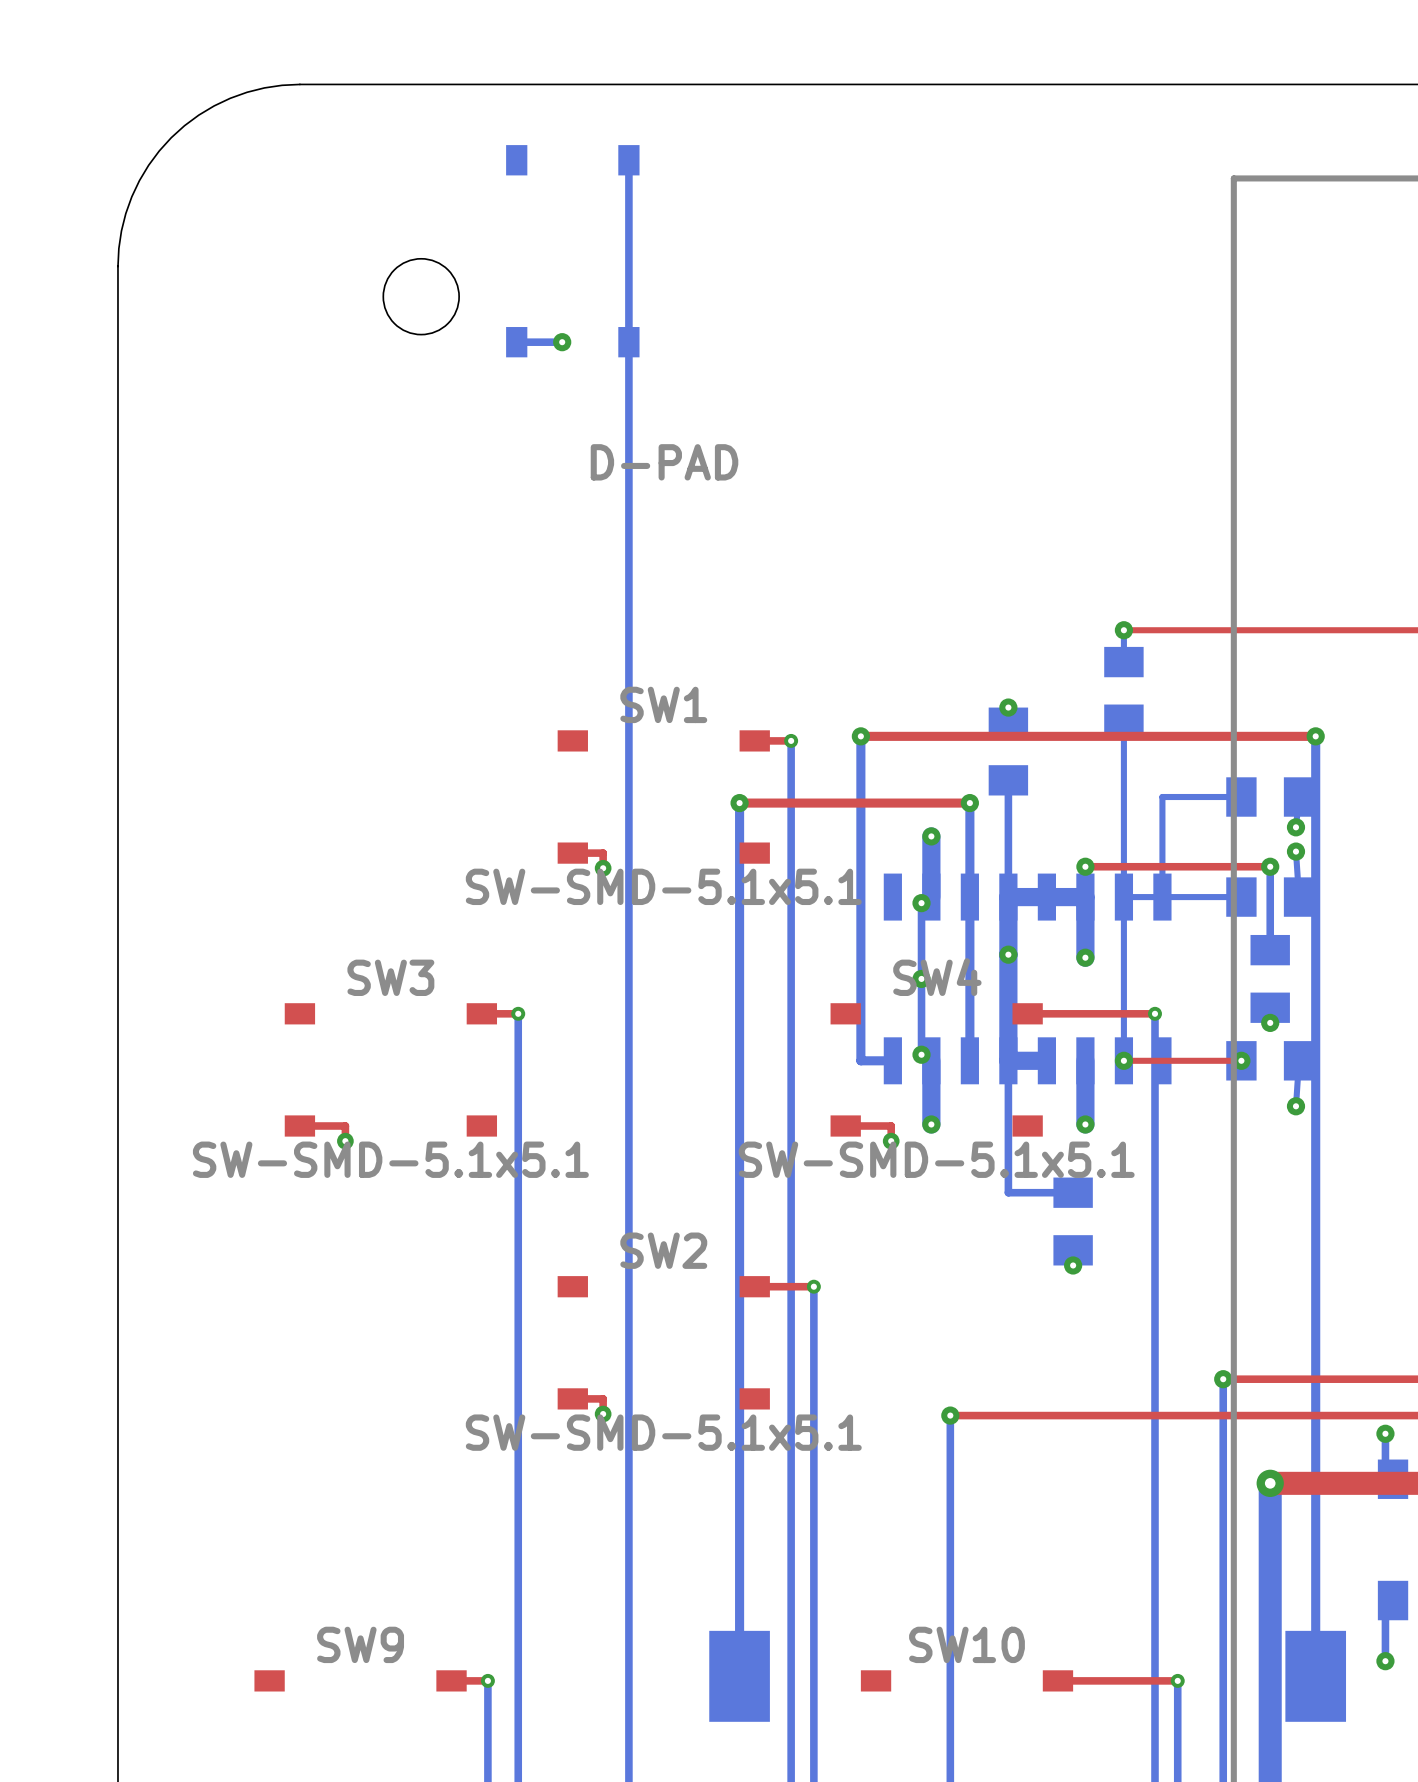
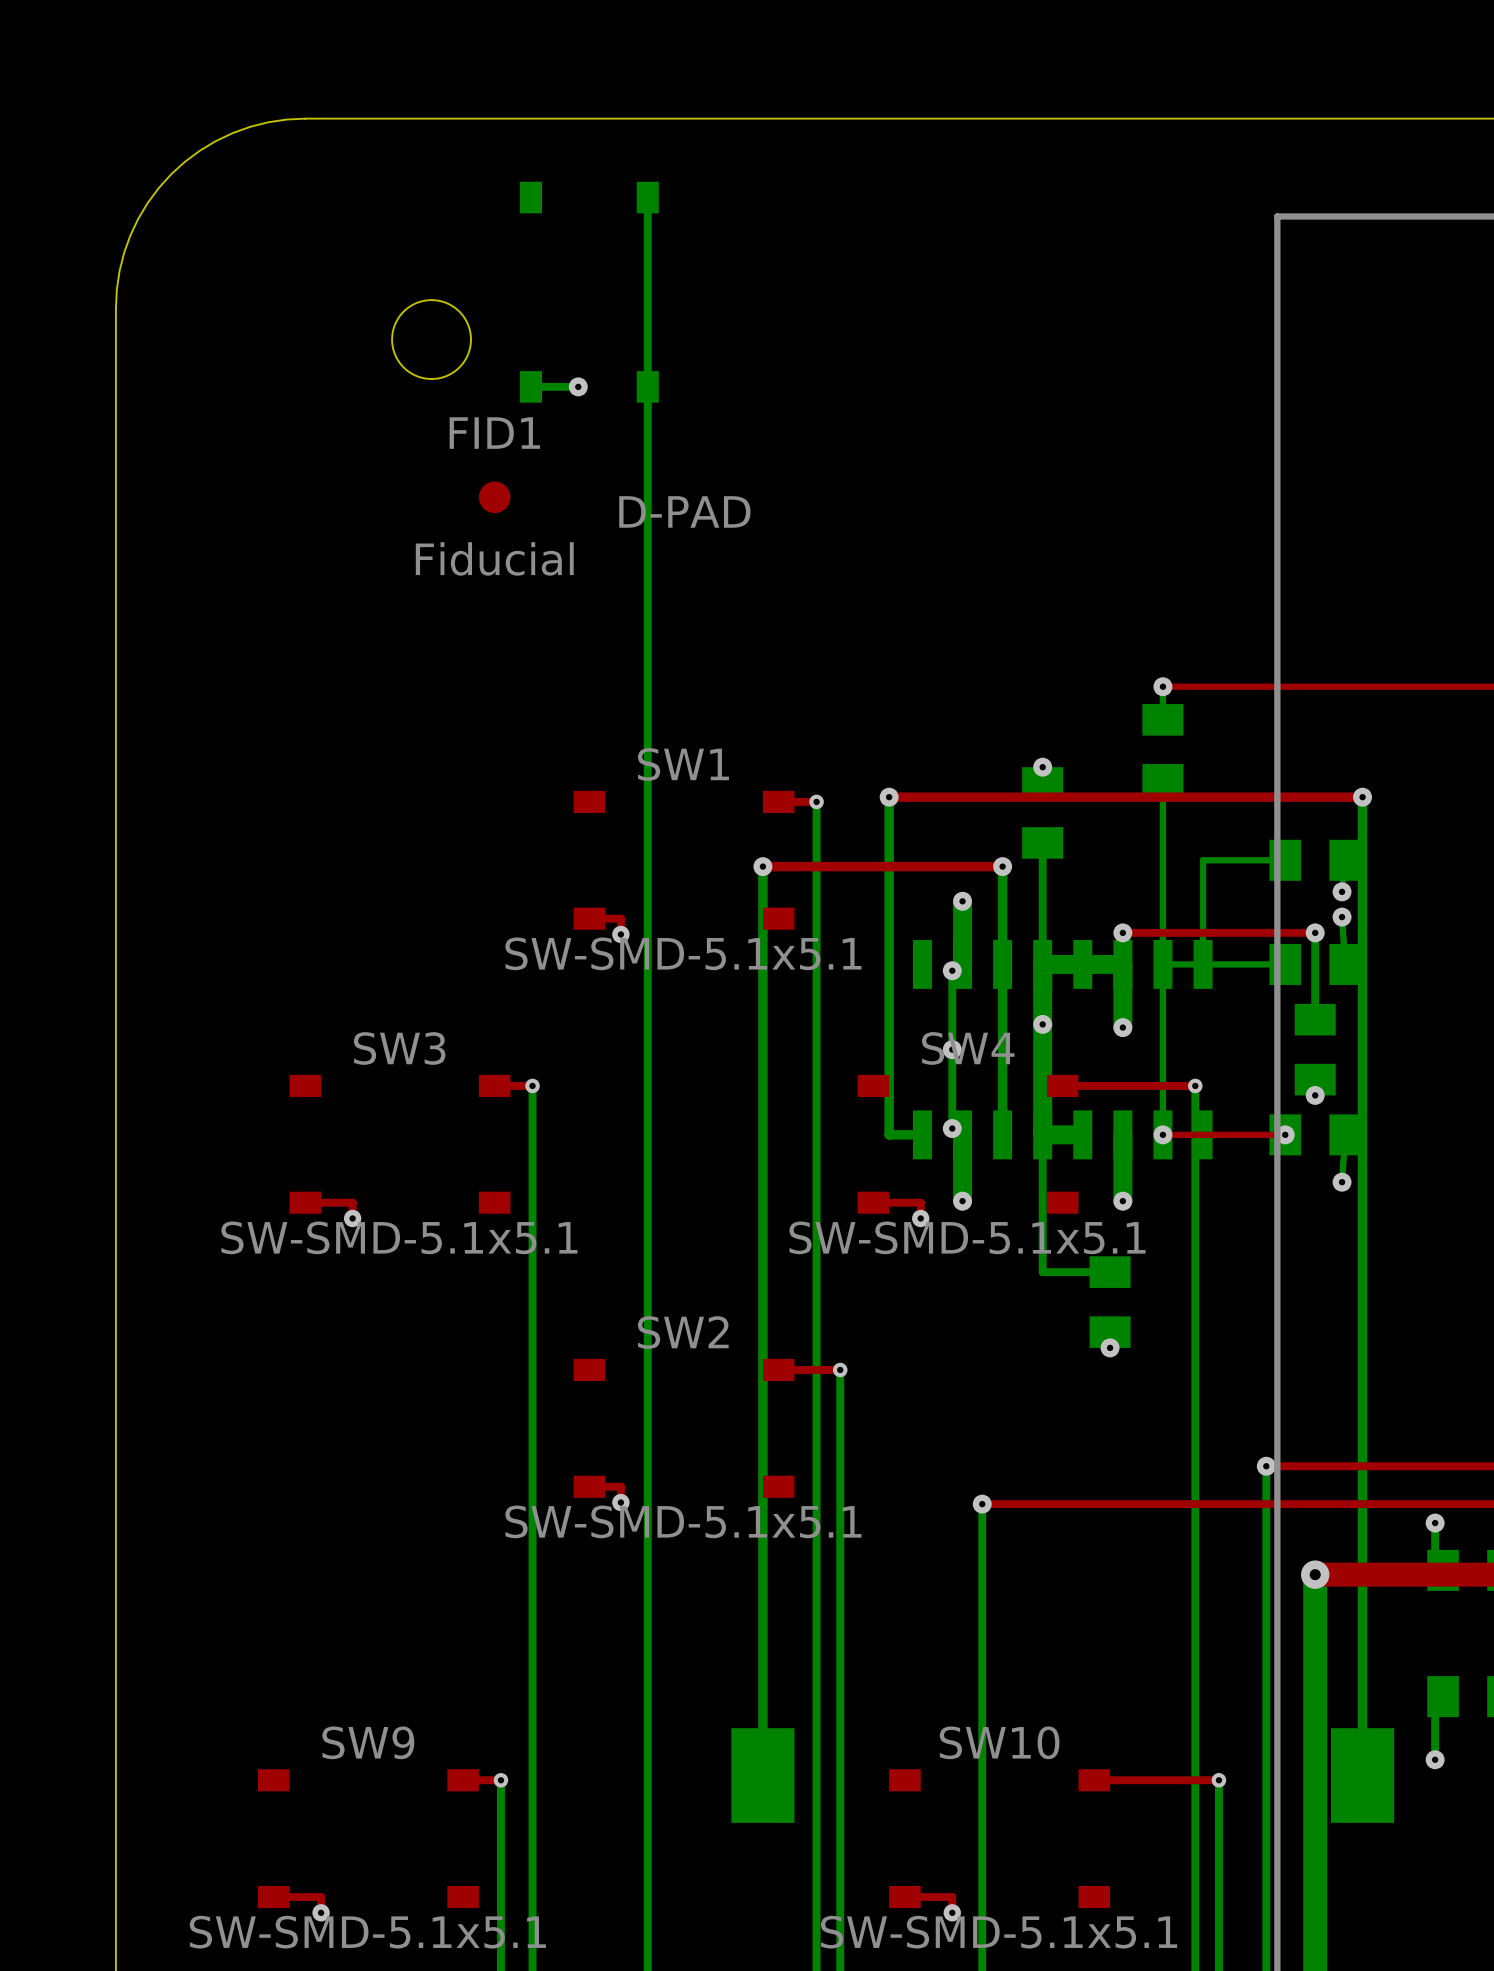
FID1: none -> Fiducial (494, 497)

